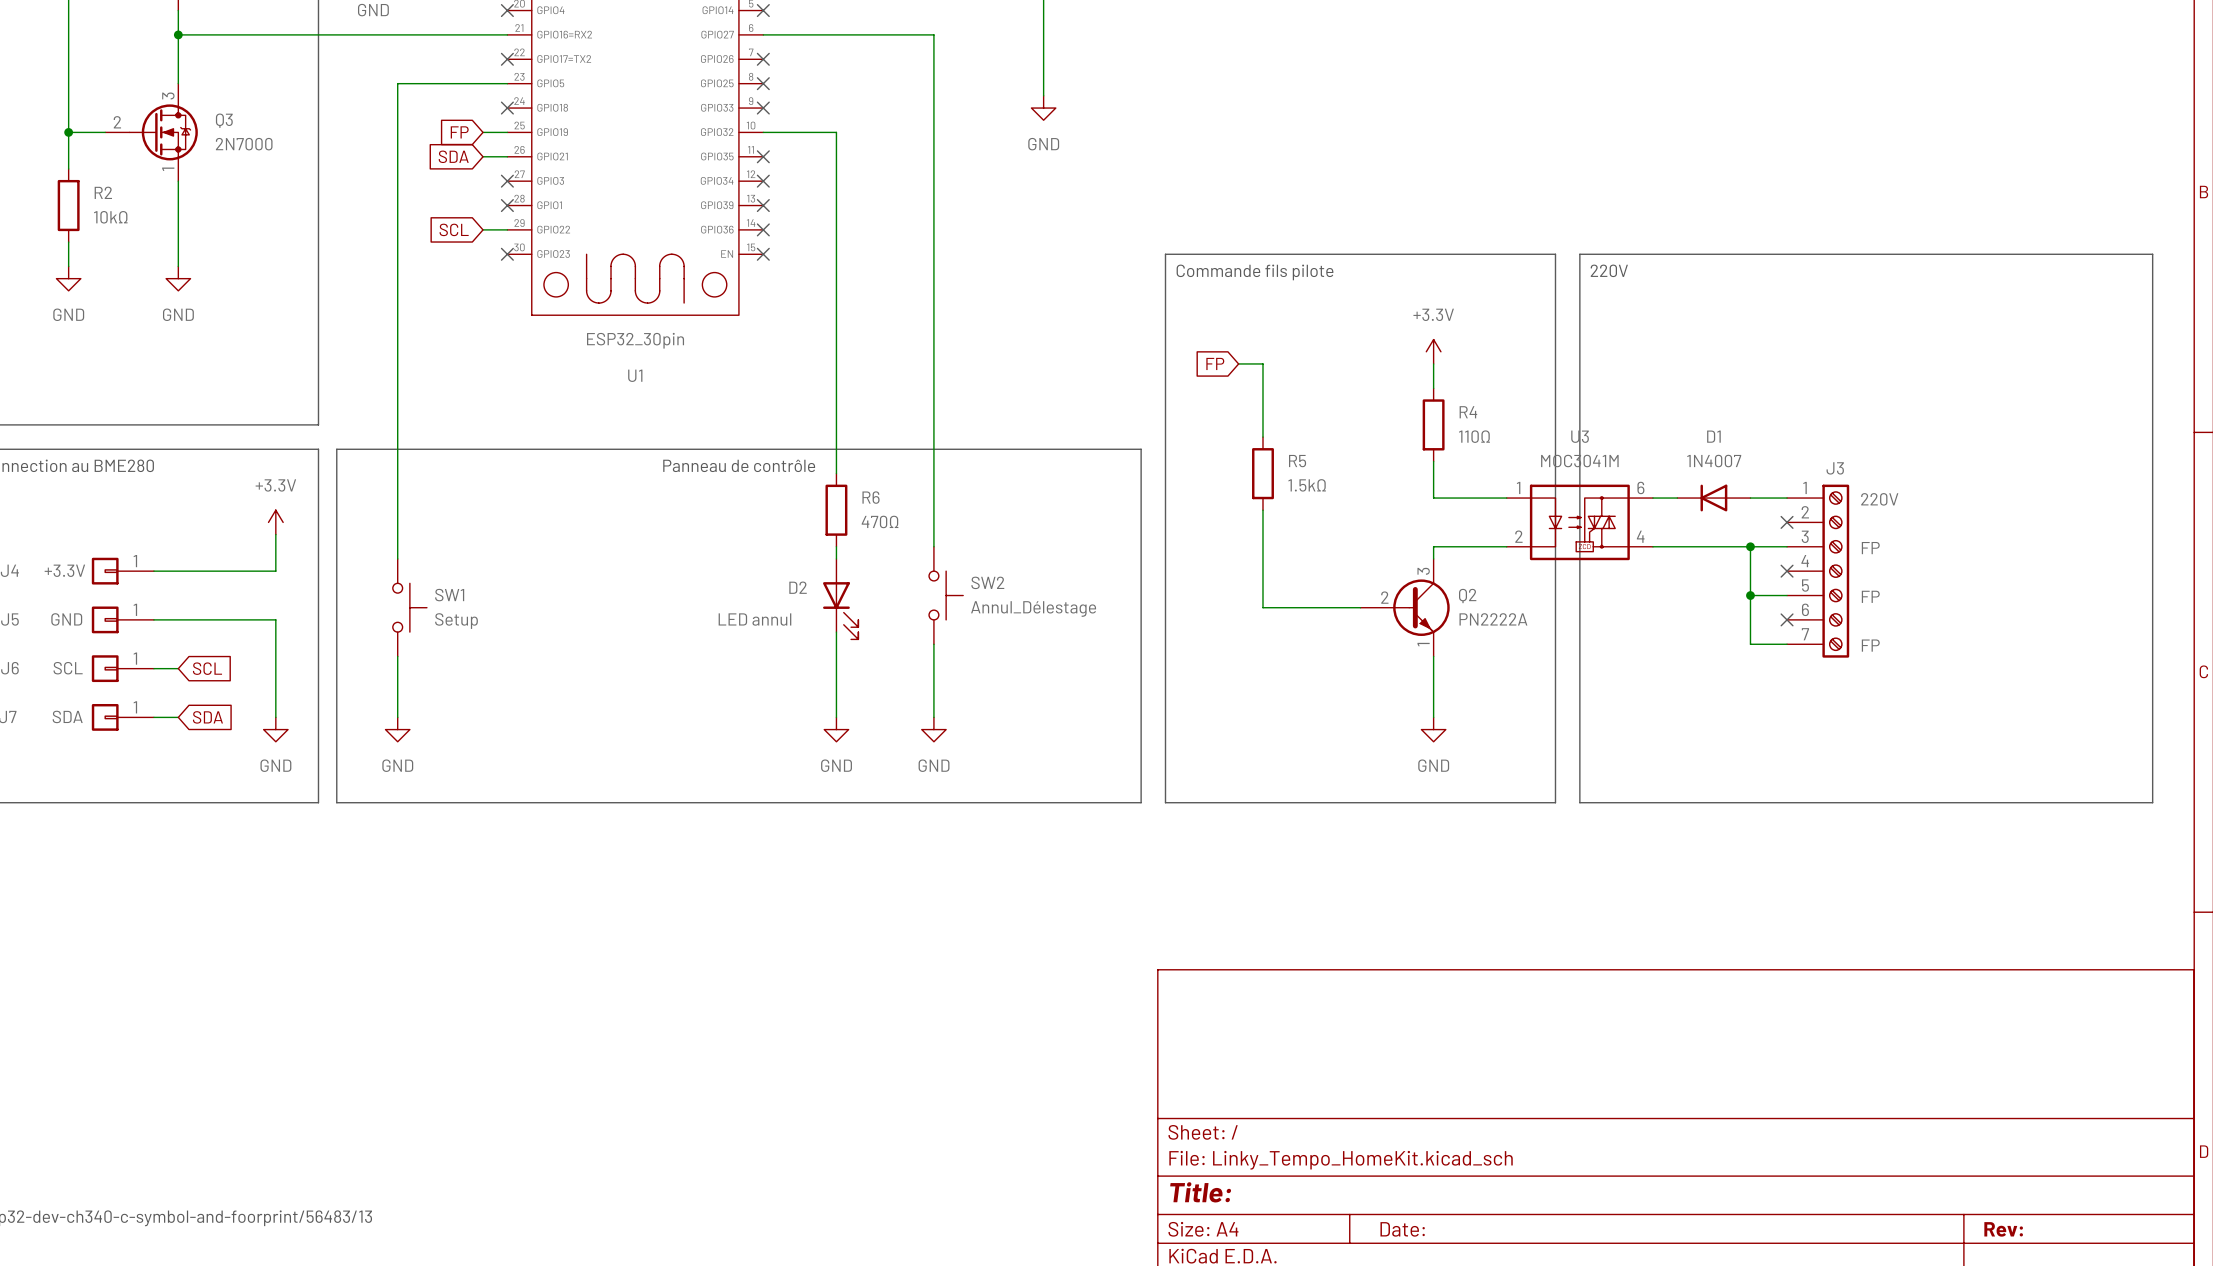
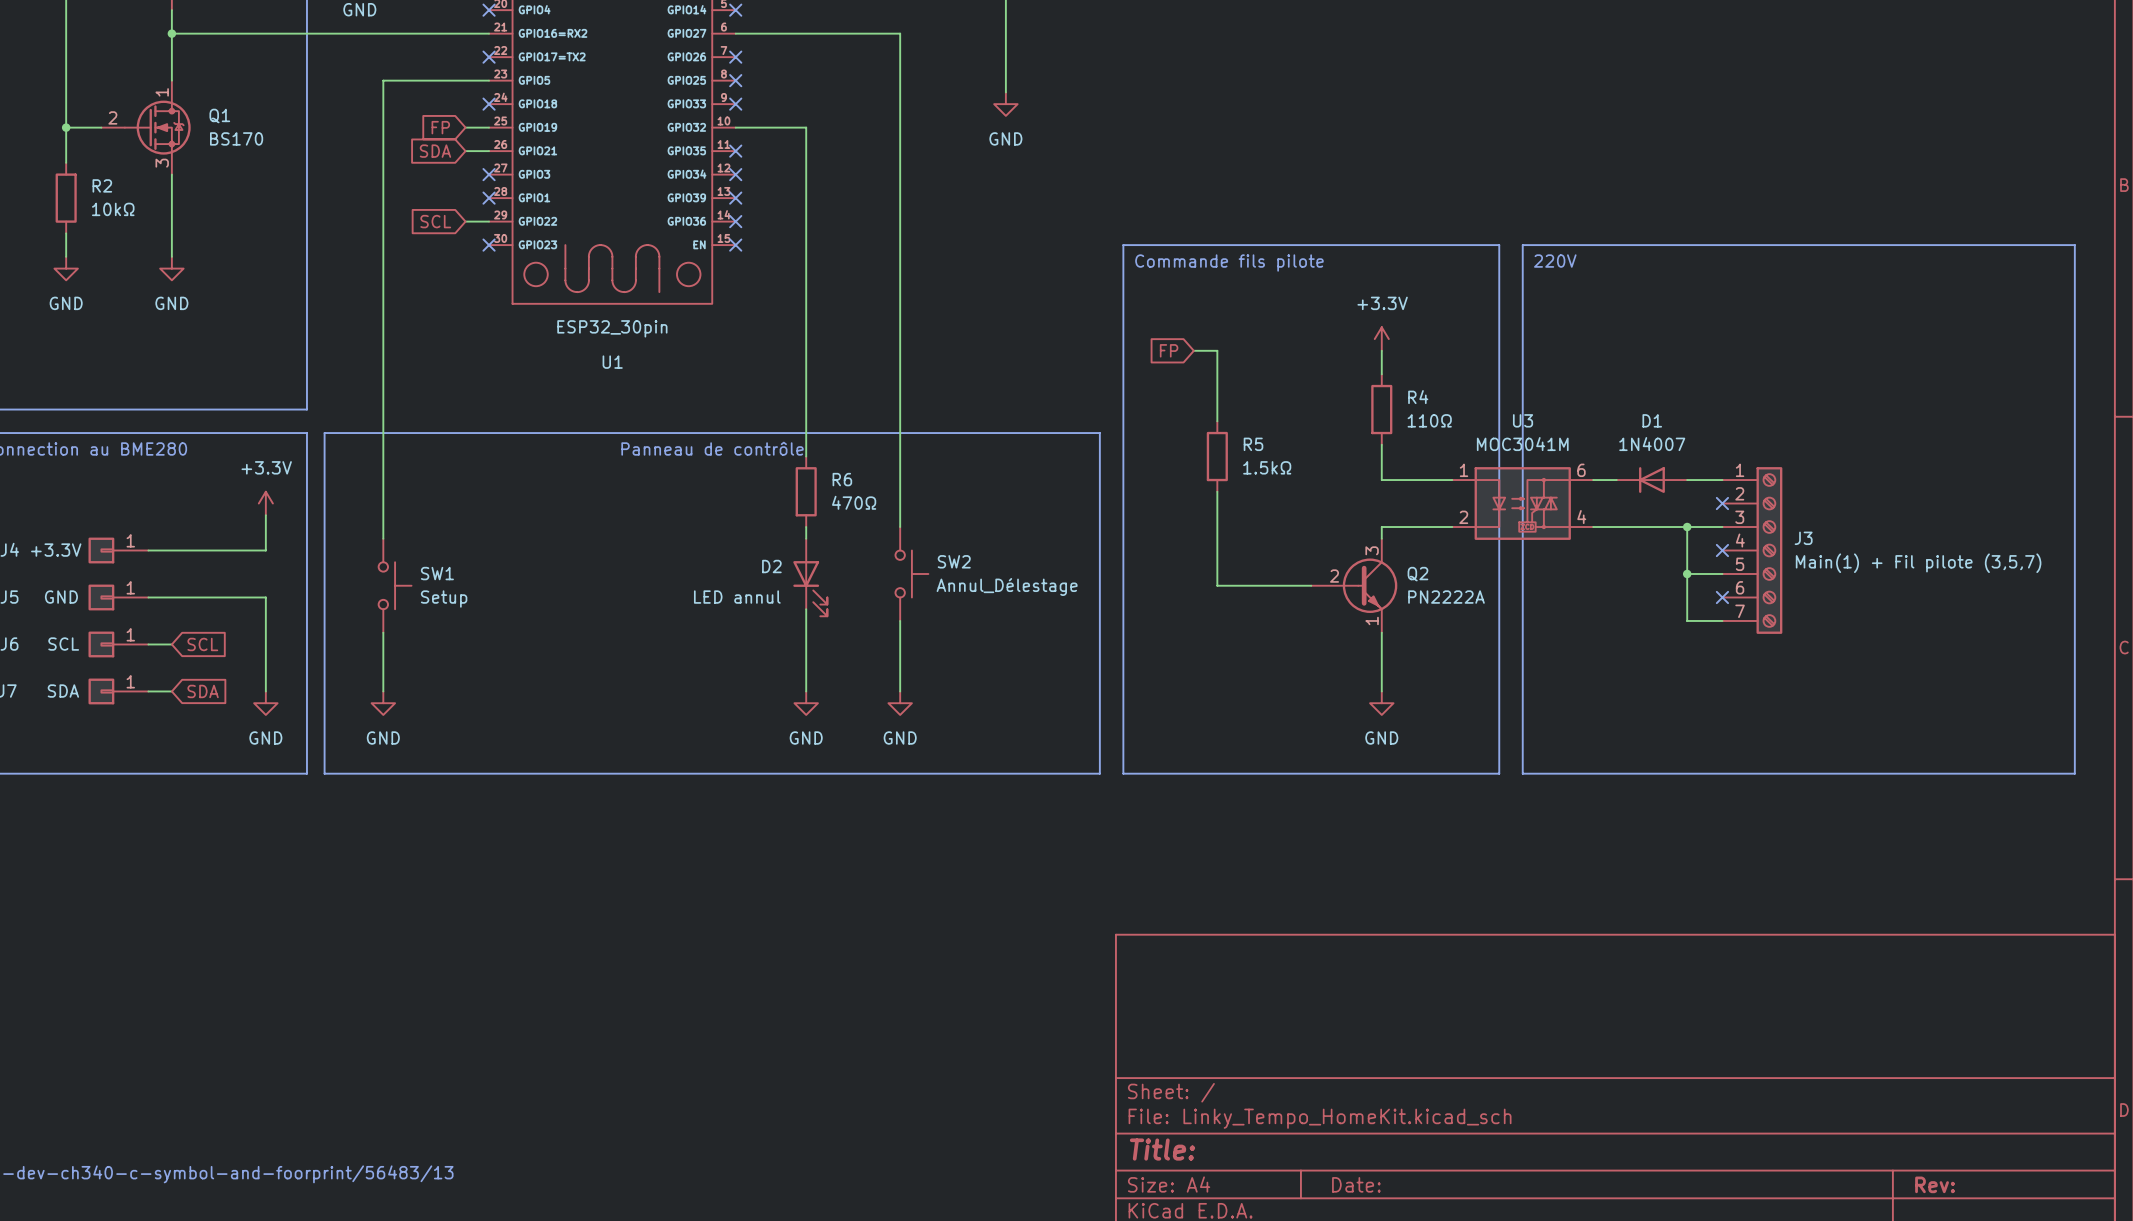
Q3 pin number: 3 (168, 95) -> 1 (162, 92)
Q3 name: Q3 (224, 120) -> Q1 (219, 116)
Q3 value: 2N7000 (244, 144) -> BS170 (236, 138)
Q3 pin number: 1 (168, 169) -> 3 (162, 163)
J3 name position: J3 (1835, 468) -> J3 (1803, 538)
label: 220V (1879, 499) -> none
label: FP (1870, 548) -> none
J3 value: none -> Main(1) + Fil pilote (3,5,7) (1918, 563)
label: FP (1870, 596) -> none
label: FP (1870, 645) -> none

